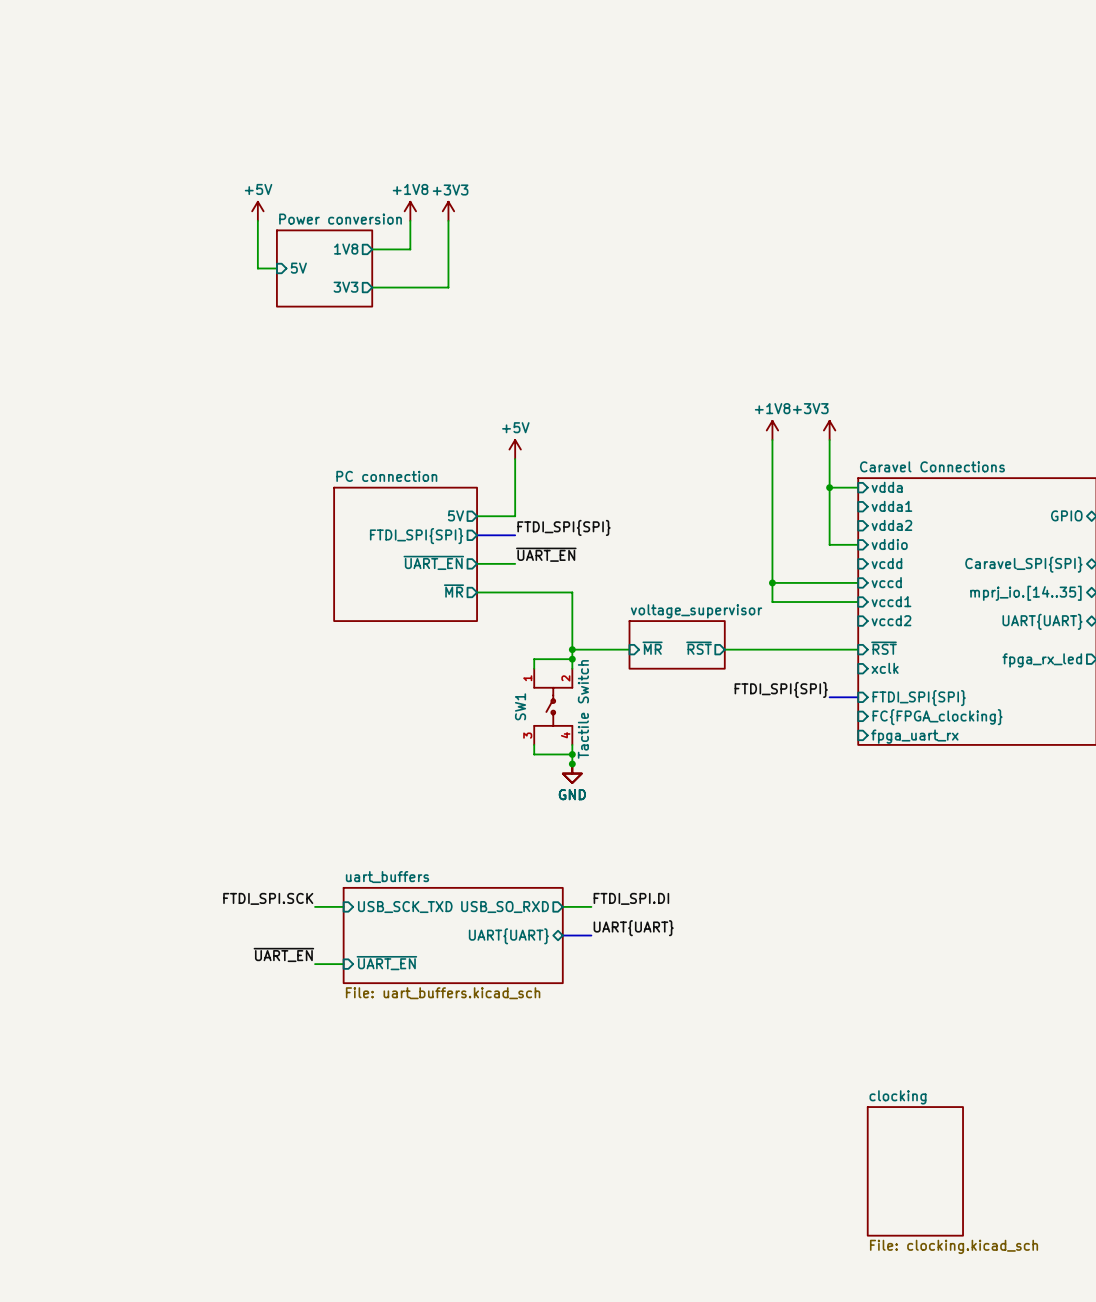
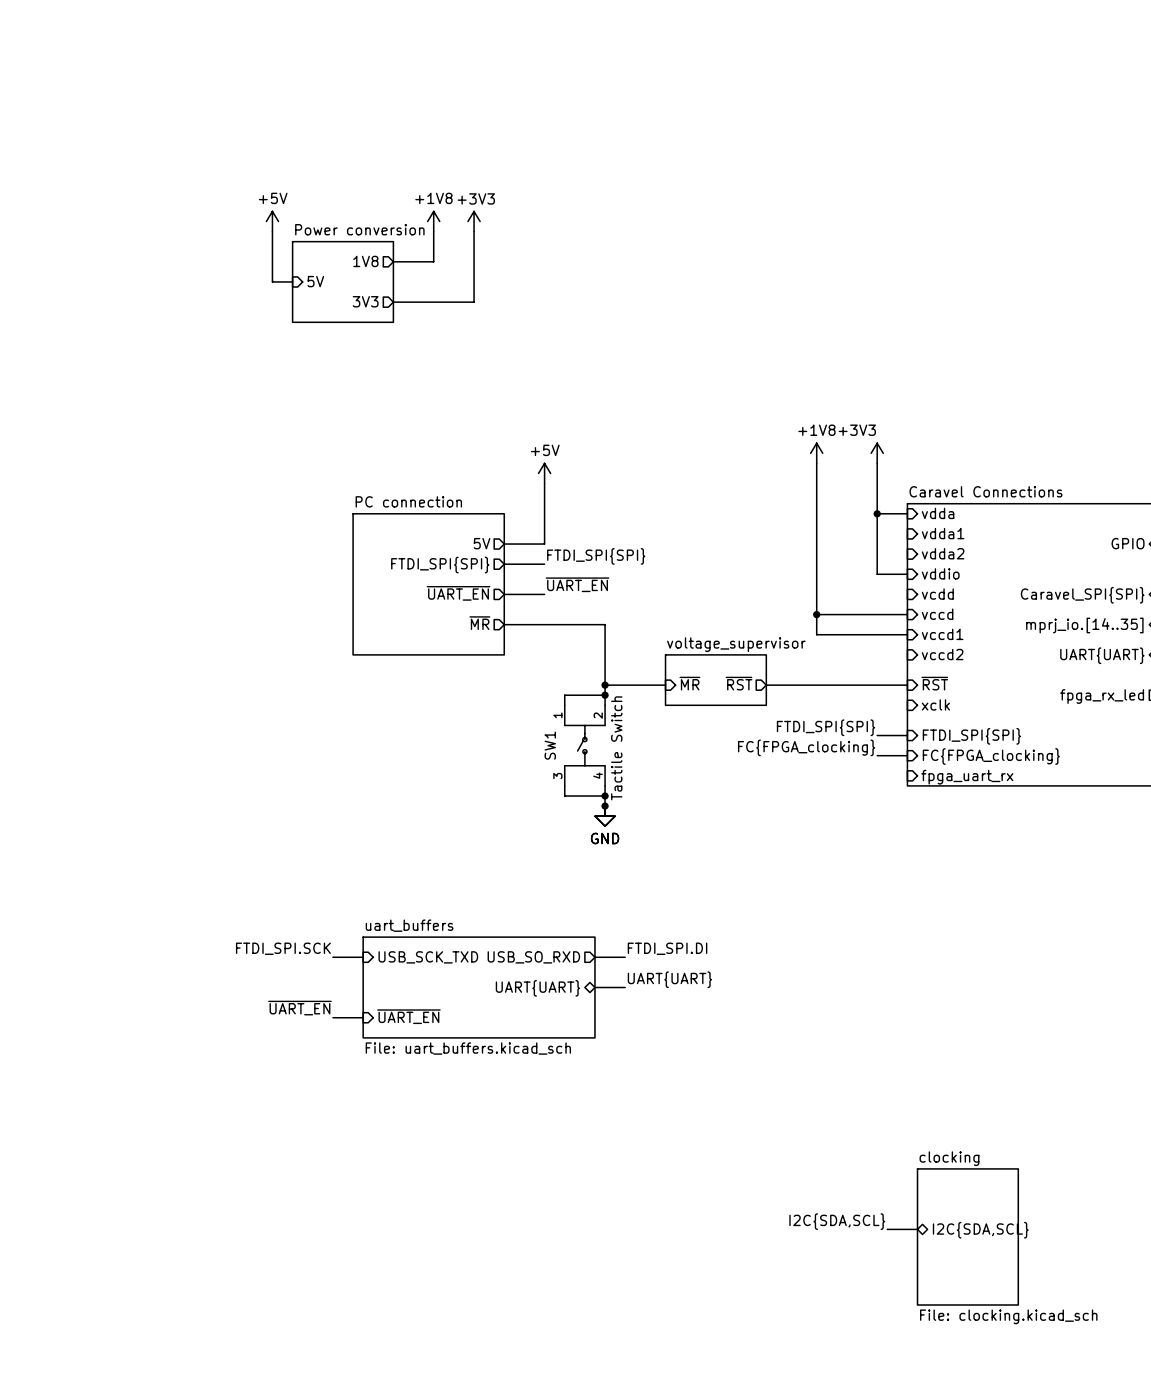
label: none -> FC{FPGA_clocking} (806, 747)
bus: none -> (877, 755) (907, 755)
label: none -> I2C{SDA,SCL} (837, 1221)
bus: none -> (887, 1229) (917, 1229)
sheet pin: none -> I2C{SDA,SCL} (980, 1230)

